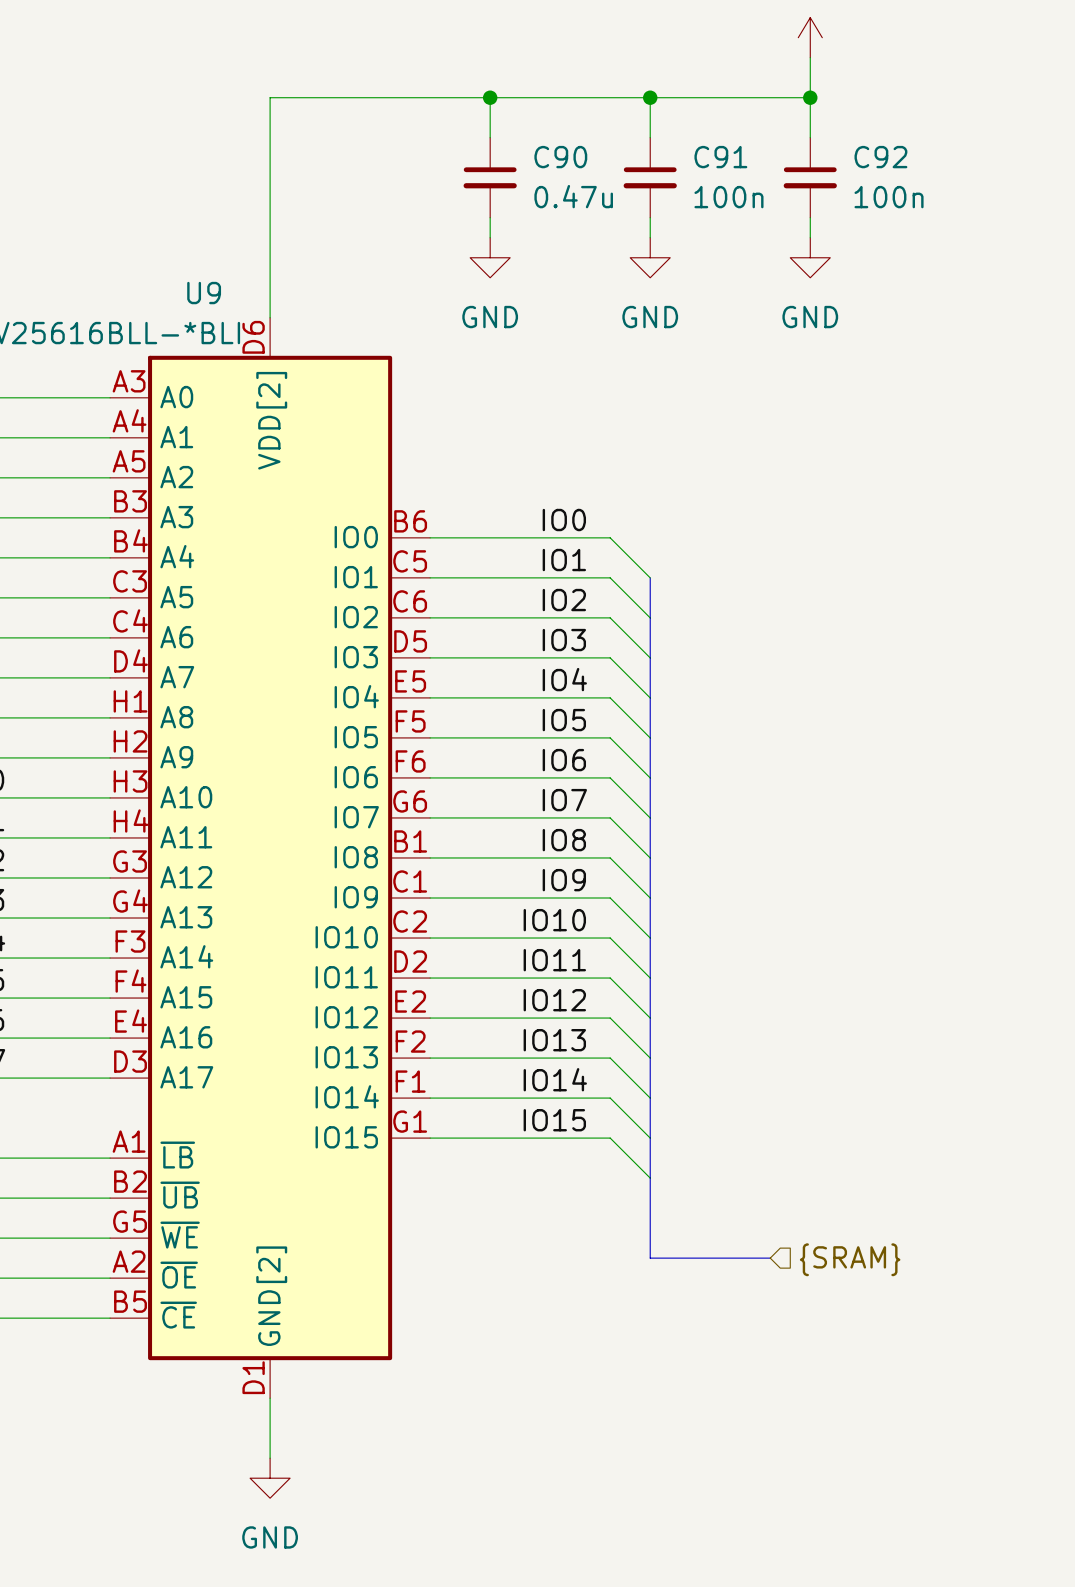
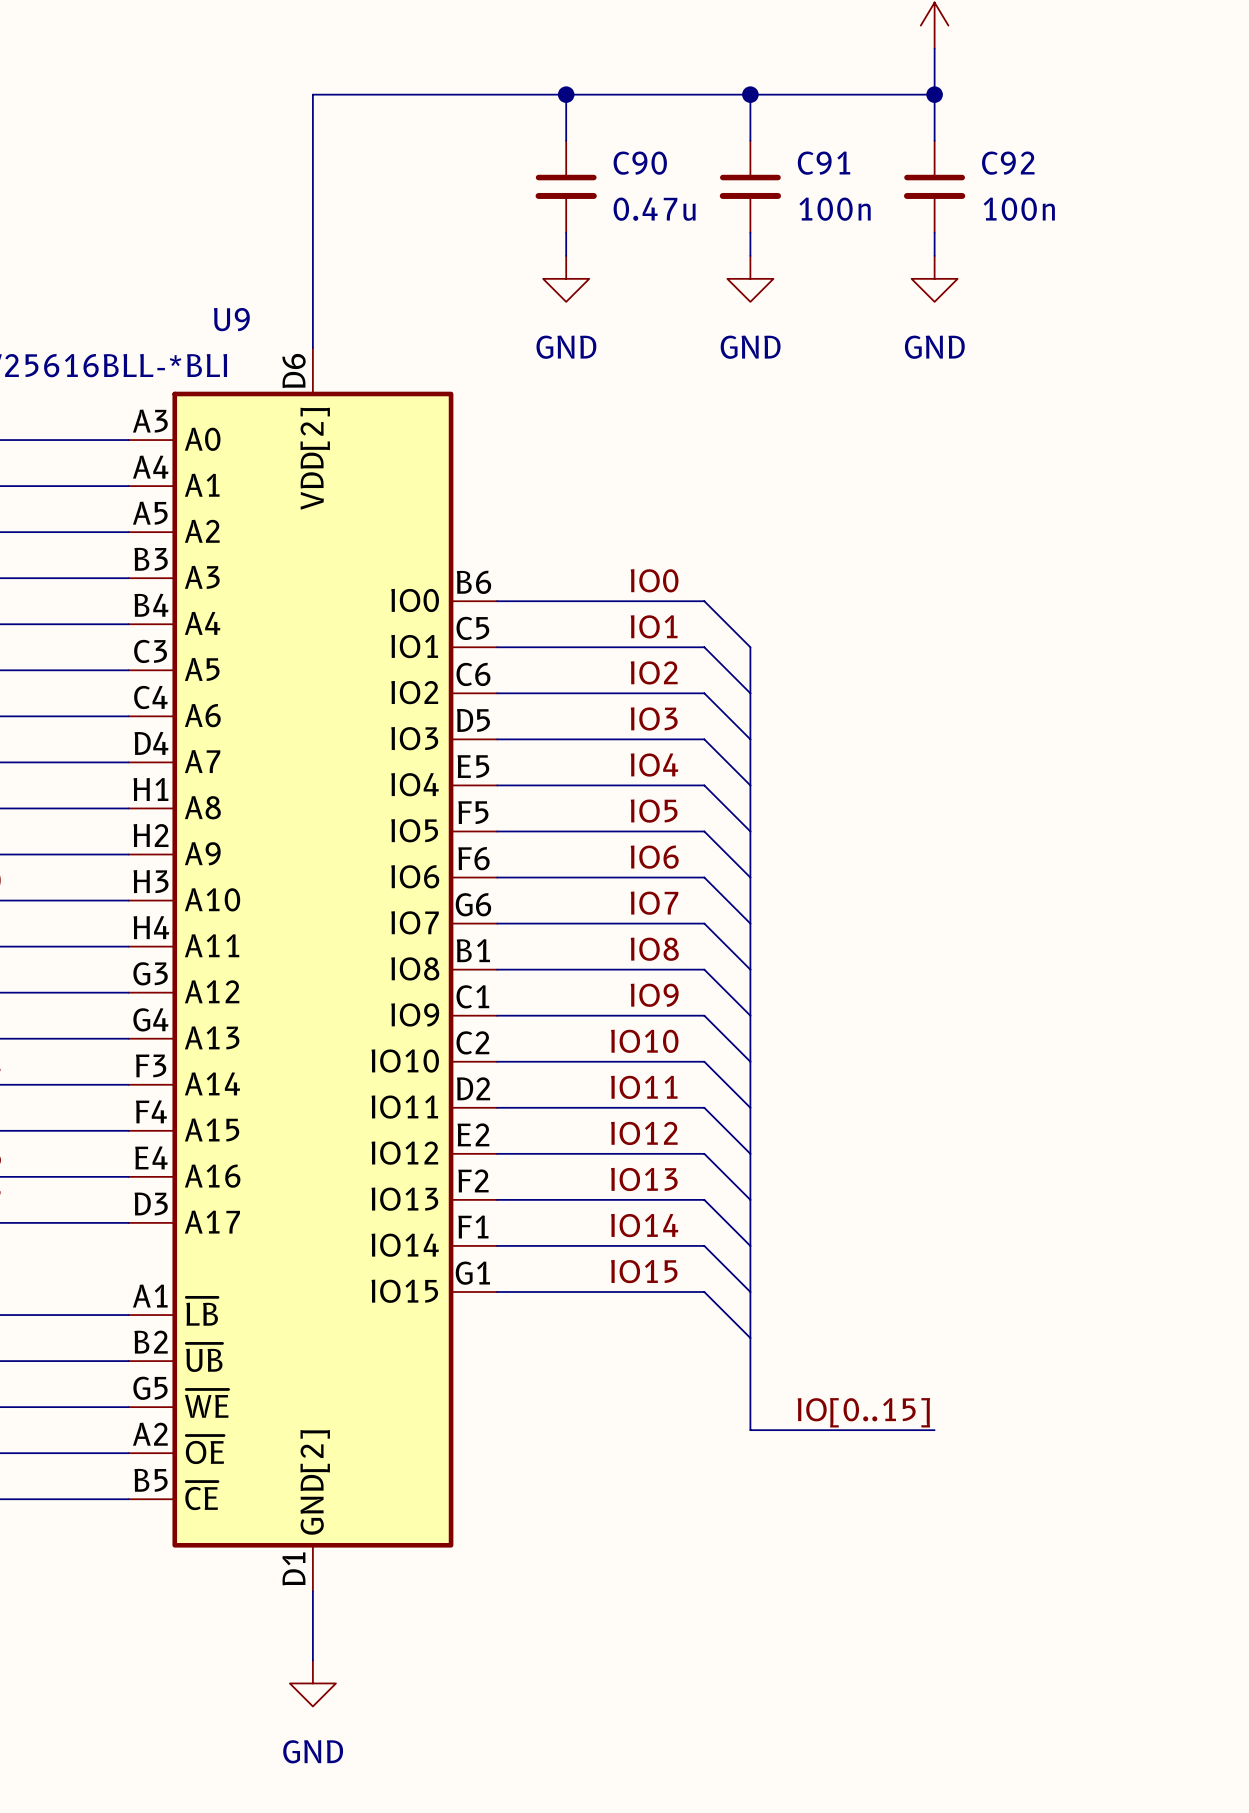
label: none -> IO[0..15] (863, 1412)
bus: none -> (888, 1430) (934, 1430)
hierarchical label: {SRAM} (850, 1259) -> none

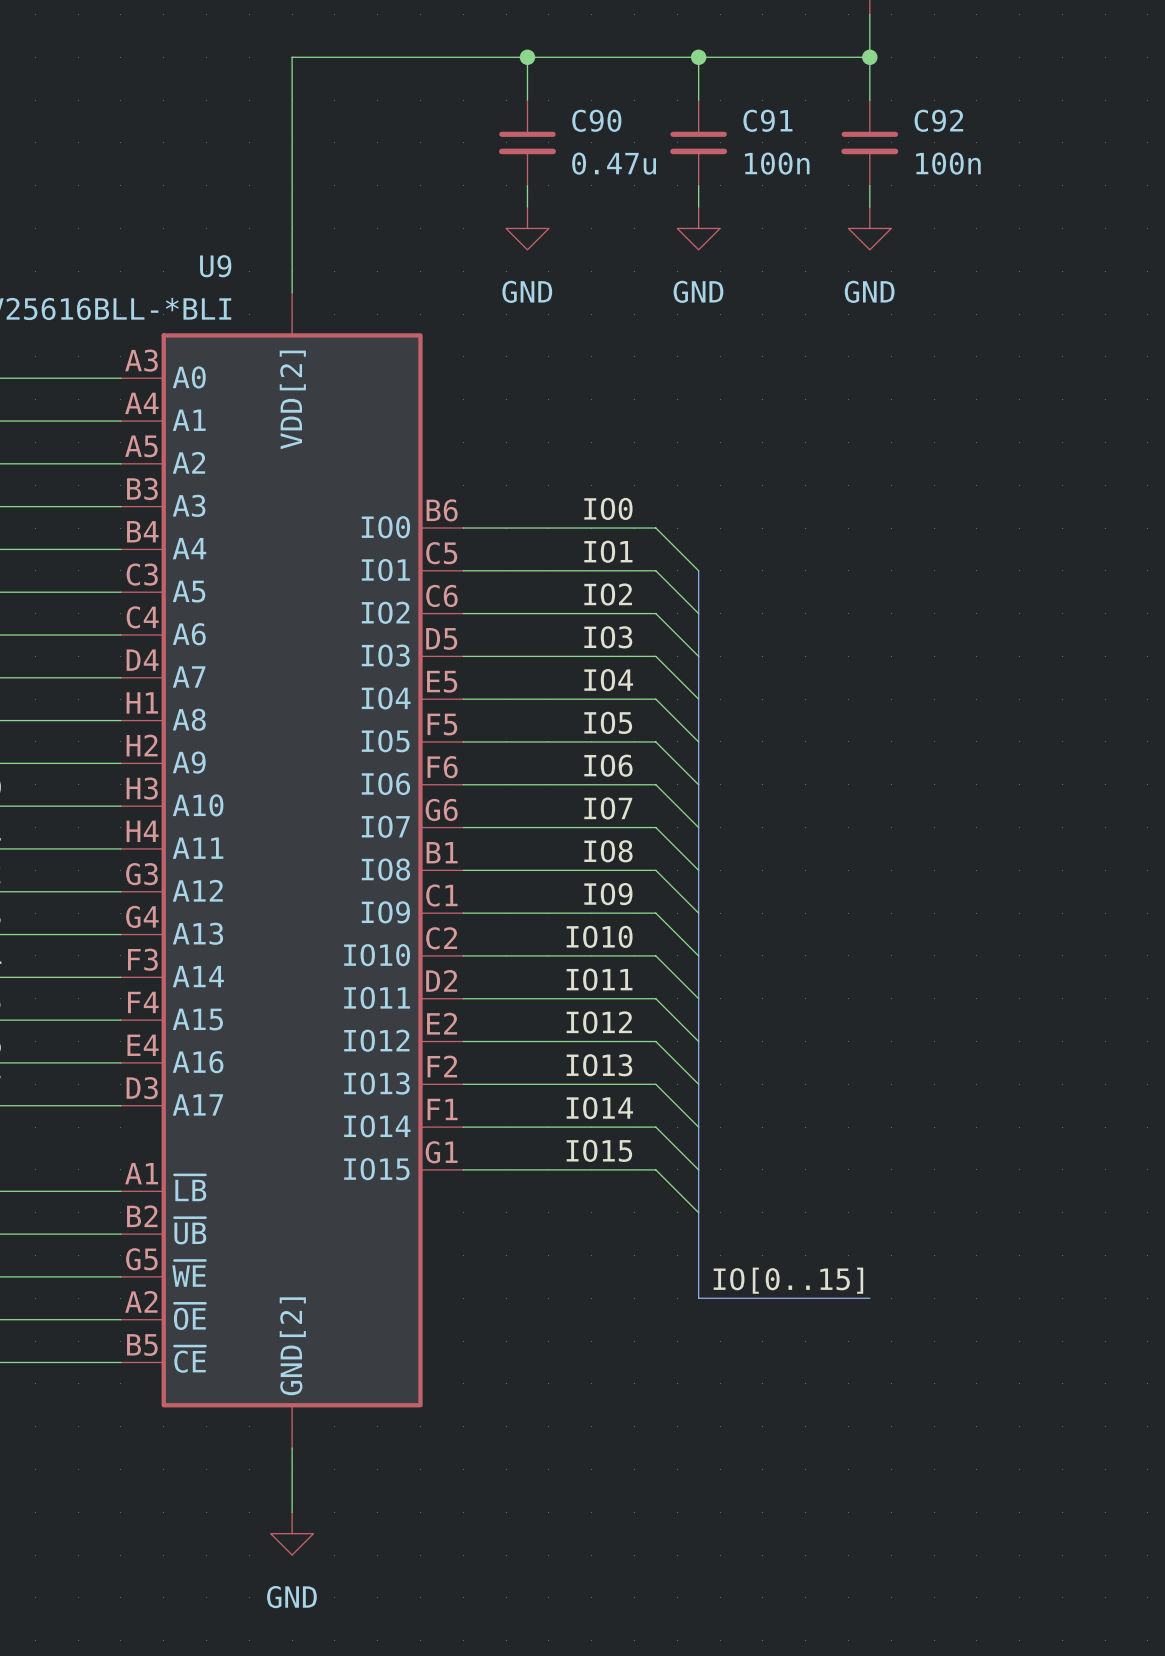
U9 pin number: D6 (294, 370) -> none
U9 pin number: D1 (293, 1568) -> none

